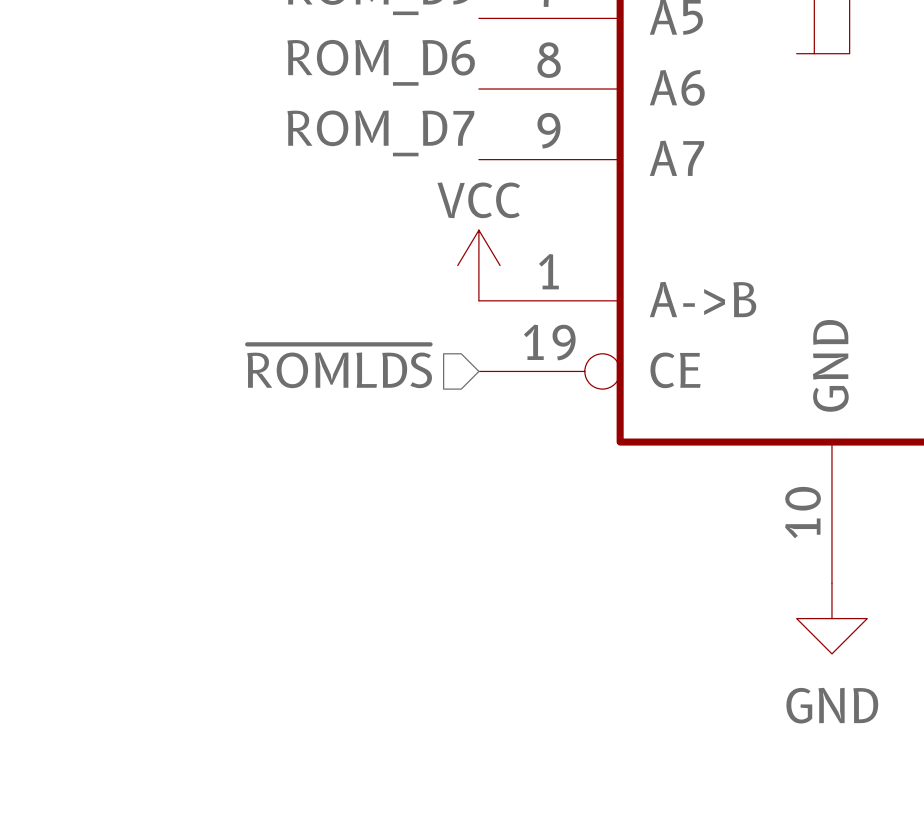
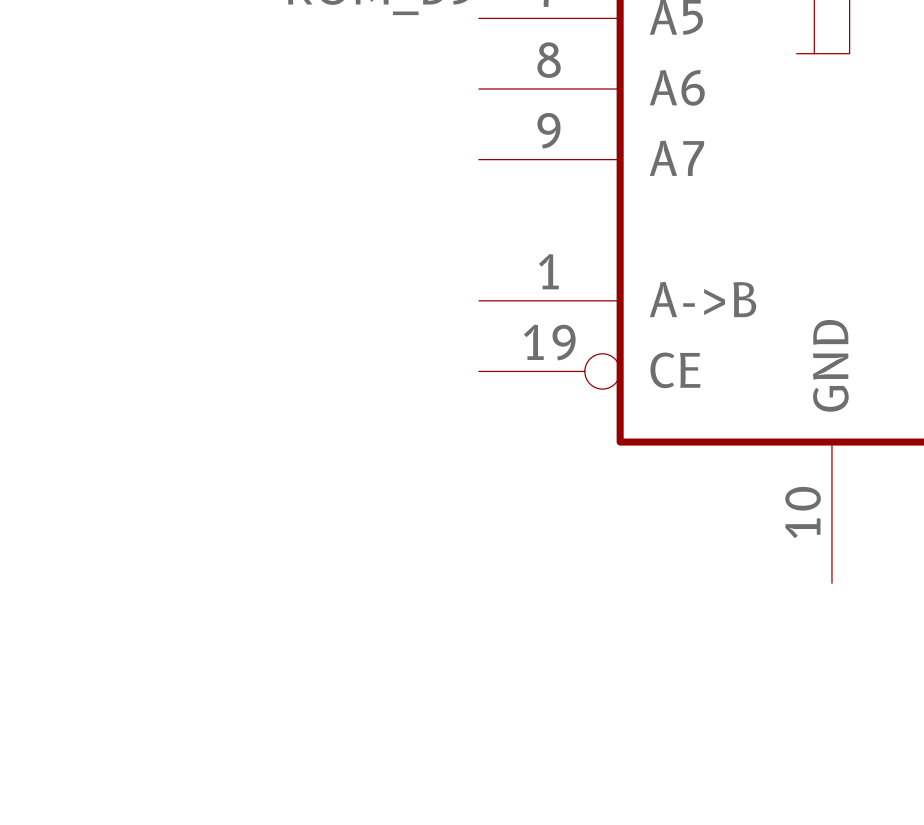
label: ROM_D6 (381, 62) -> none
label: ROM_D7 (380, 133) -> none
power symbol: VCC (478, 265) -> none
hierarchical label: ~{ROMLDS} (339, 366) -> none
power symbol: GND (831, 618) -> none

